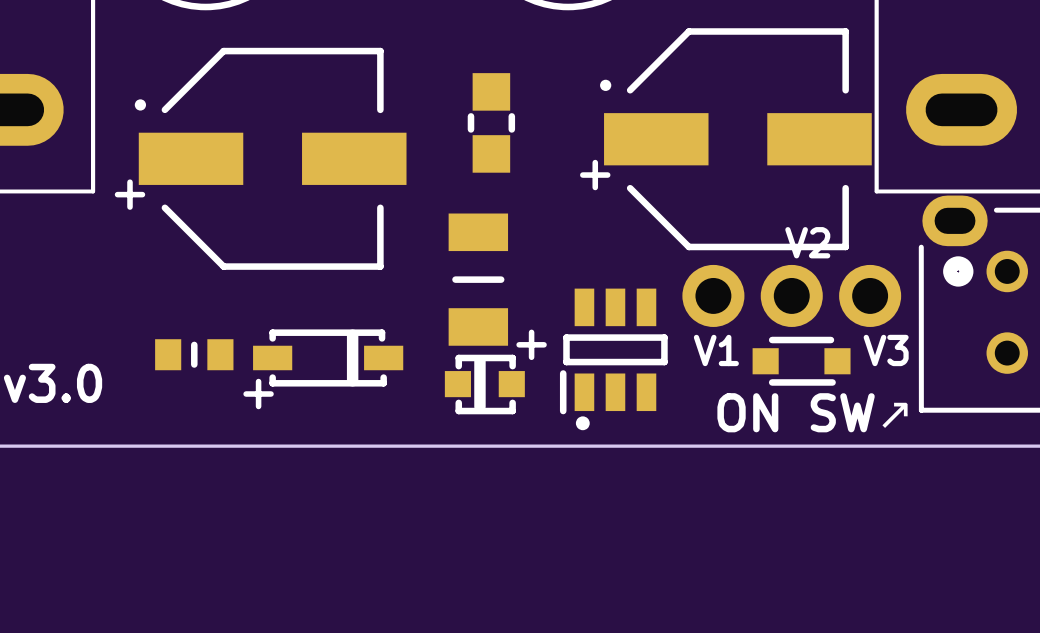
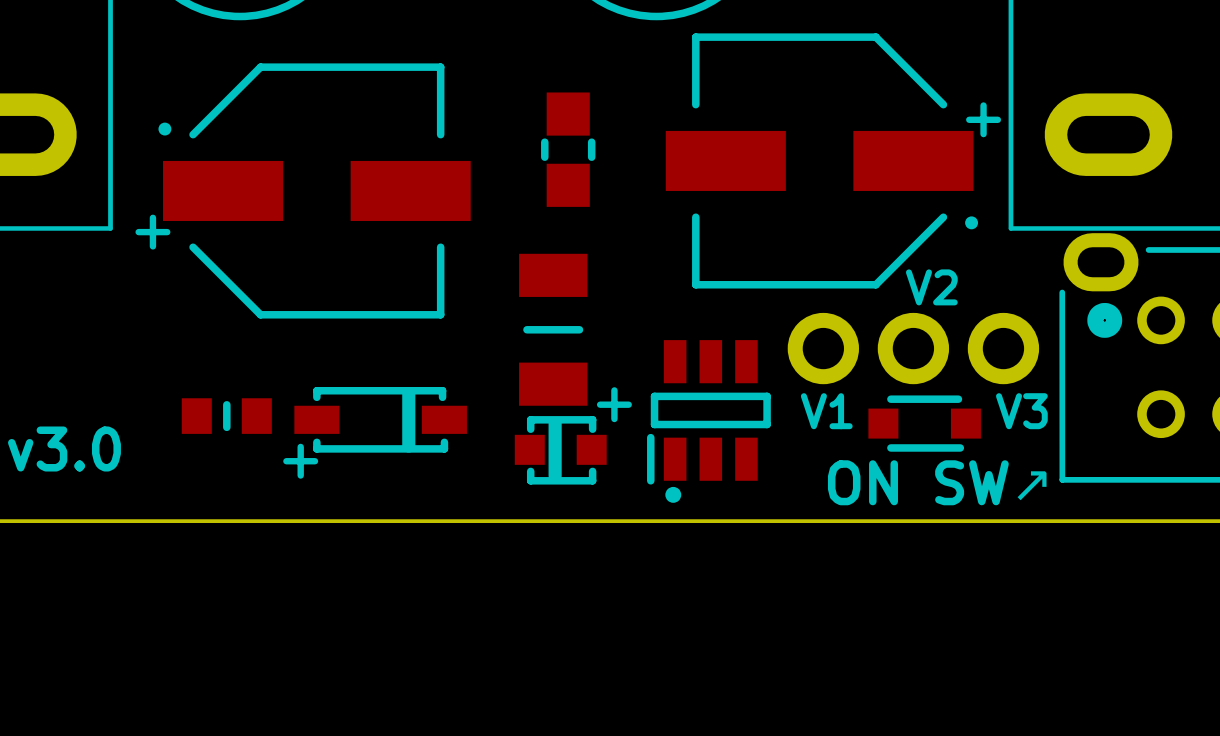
part rotation: 0° (735, 139) -> 180° (821, 160)

